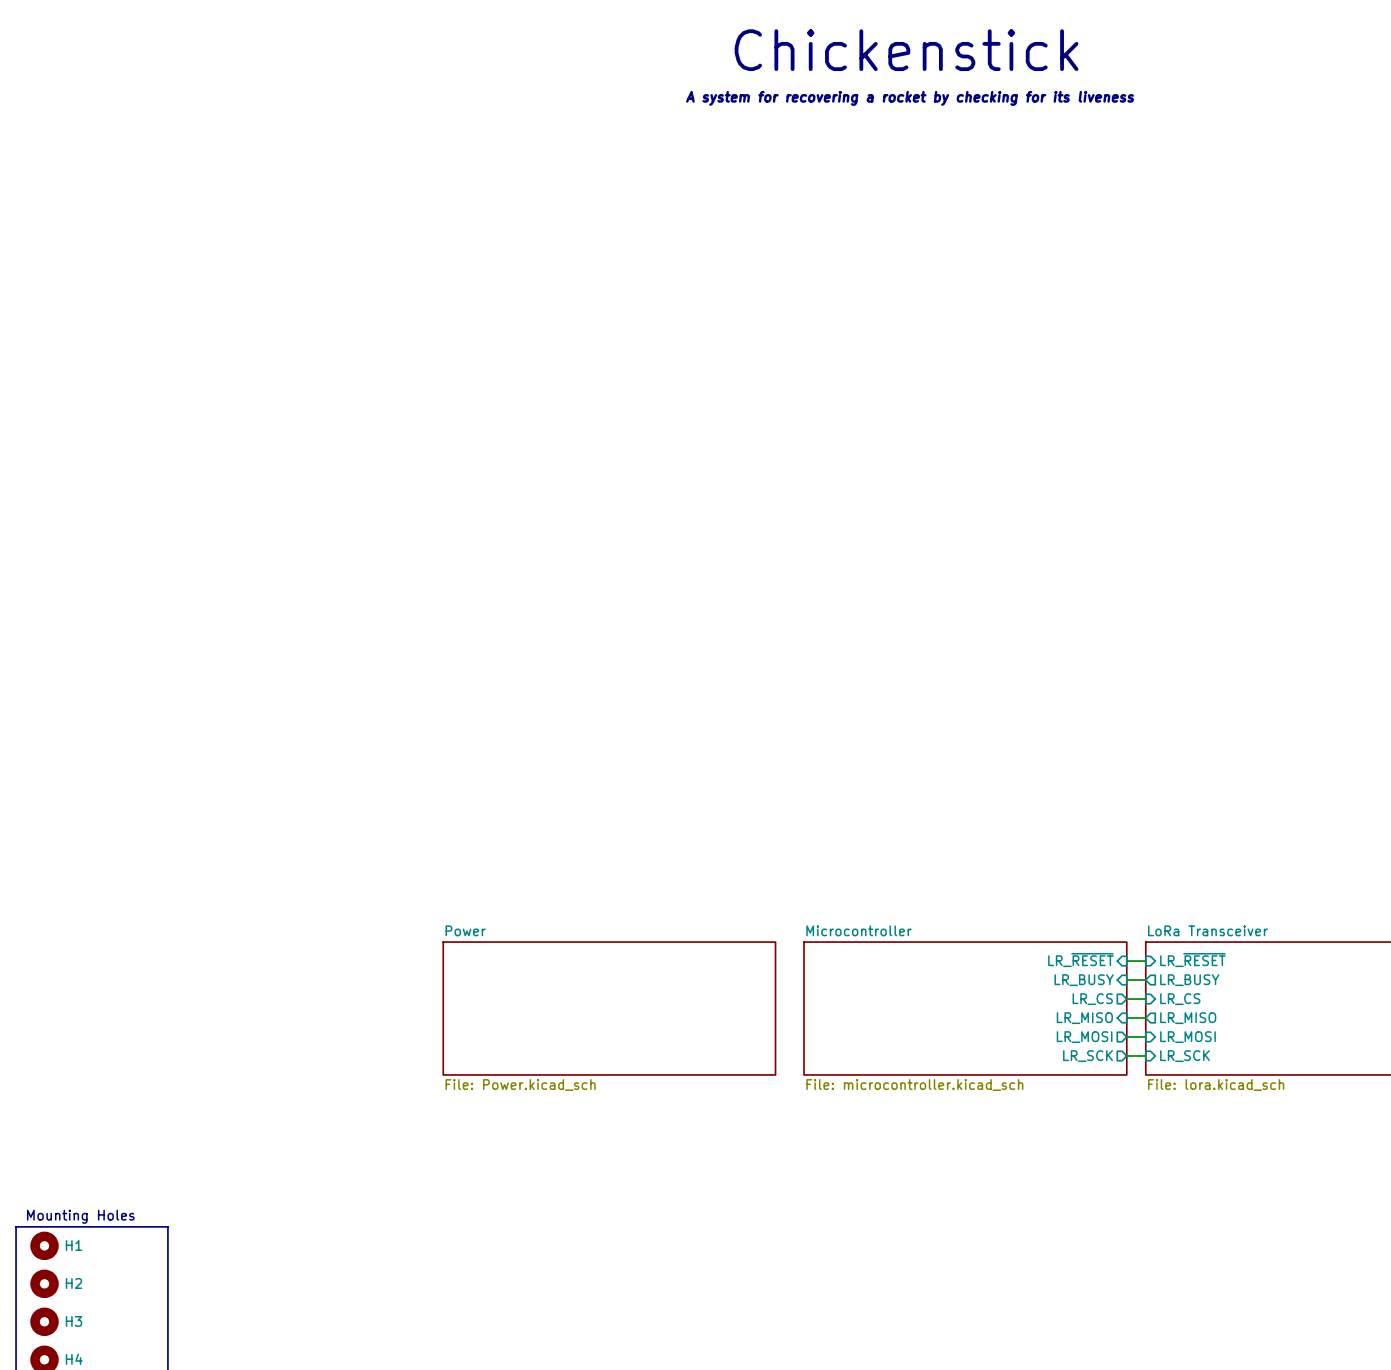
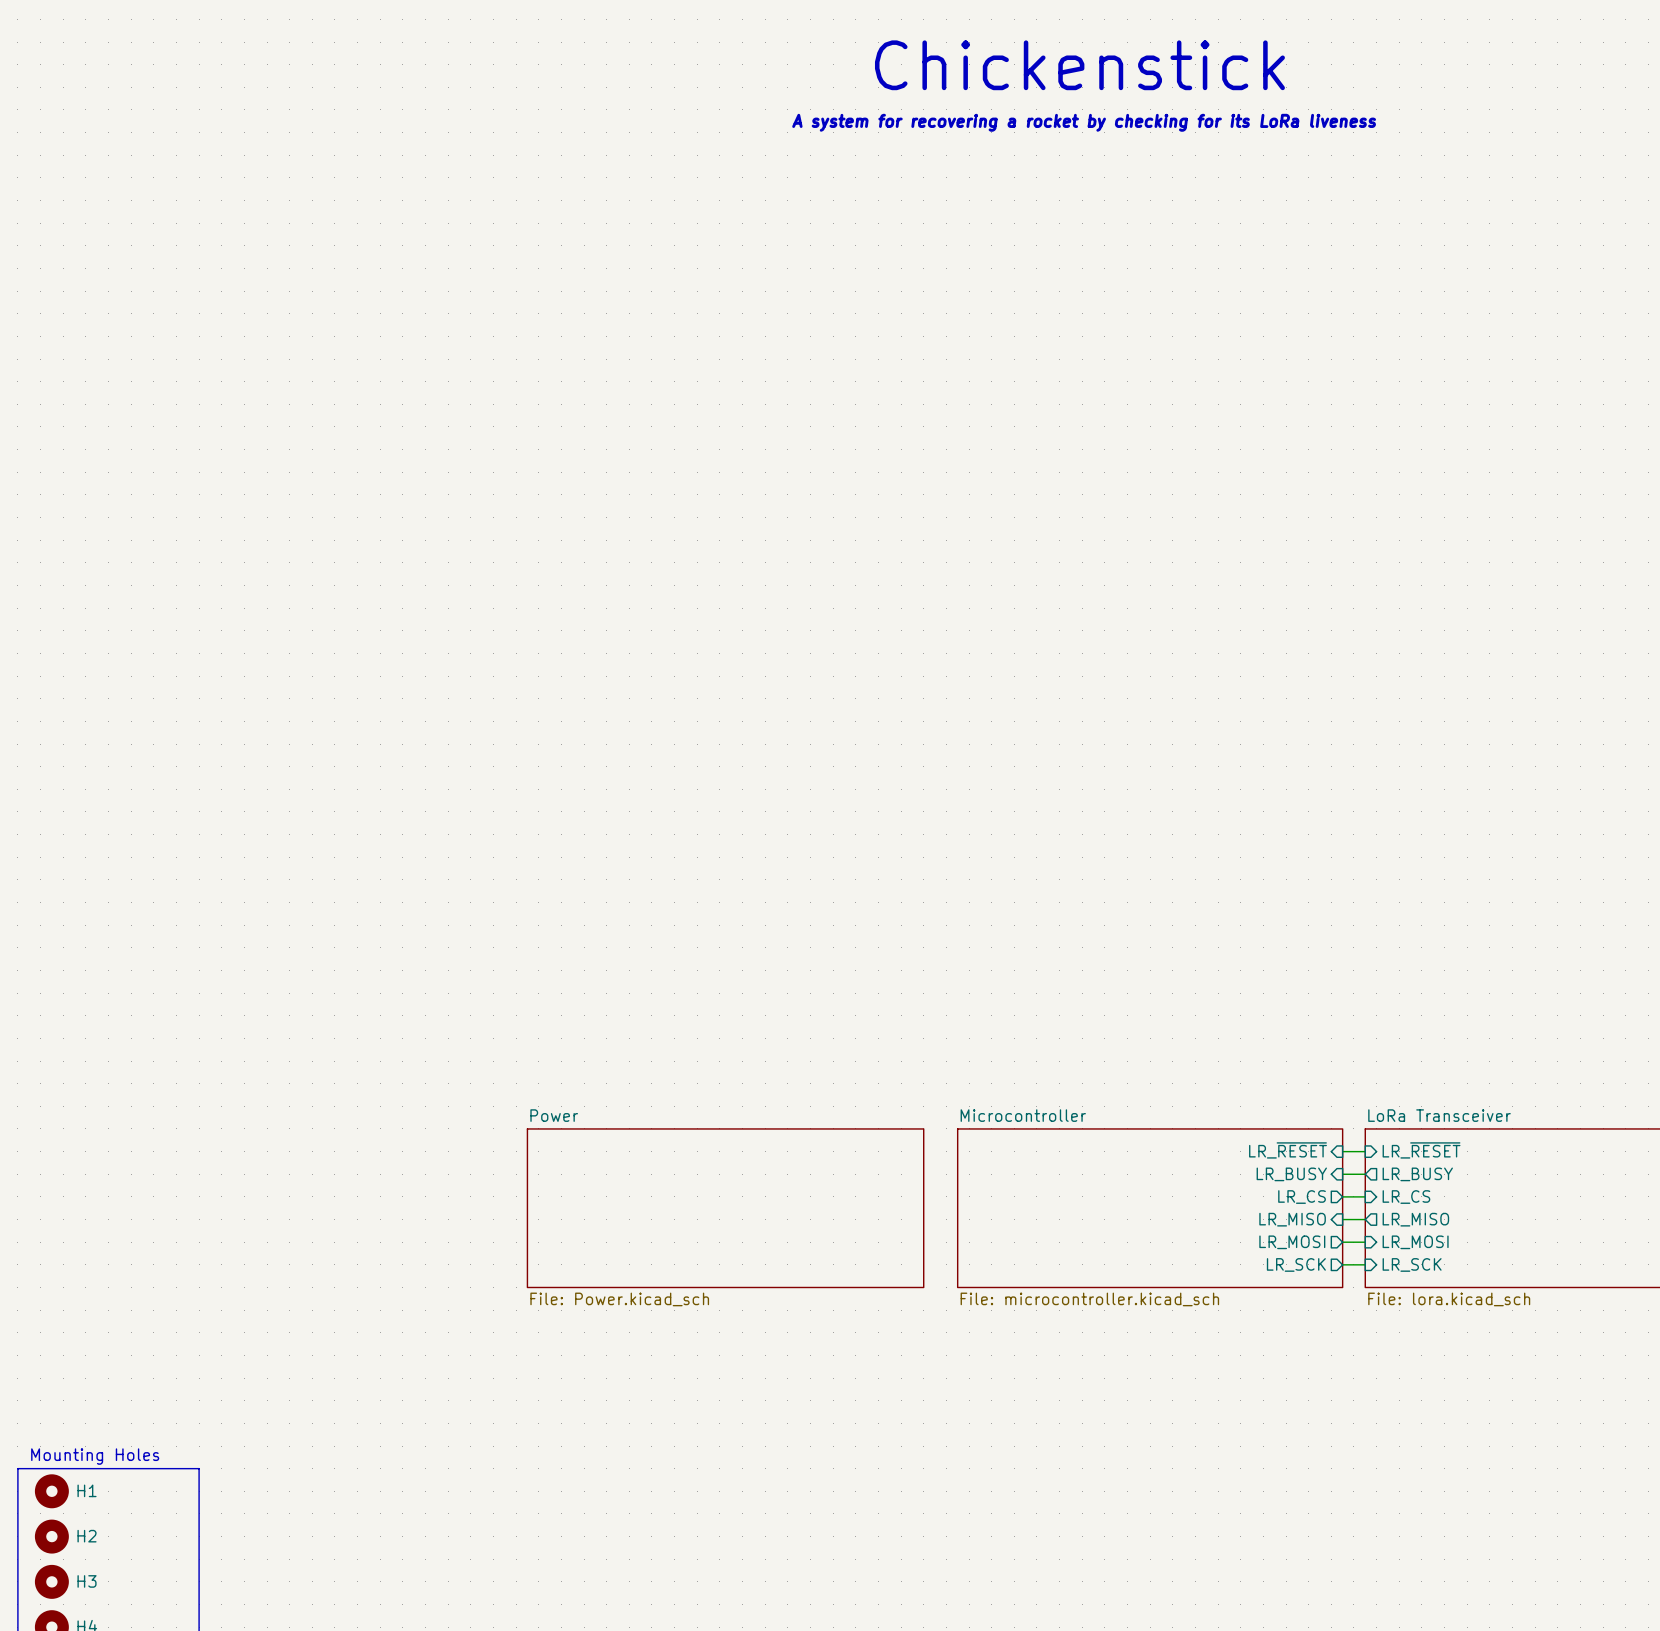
text: A system for recovering a rocket by checking for its liveness (910, 98) -> A system for recovering a rocket by checking for its LoRa liveness (1084, 122)

